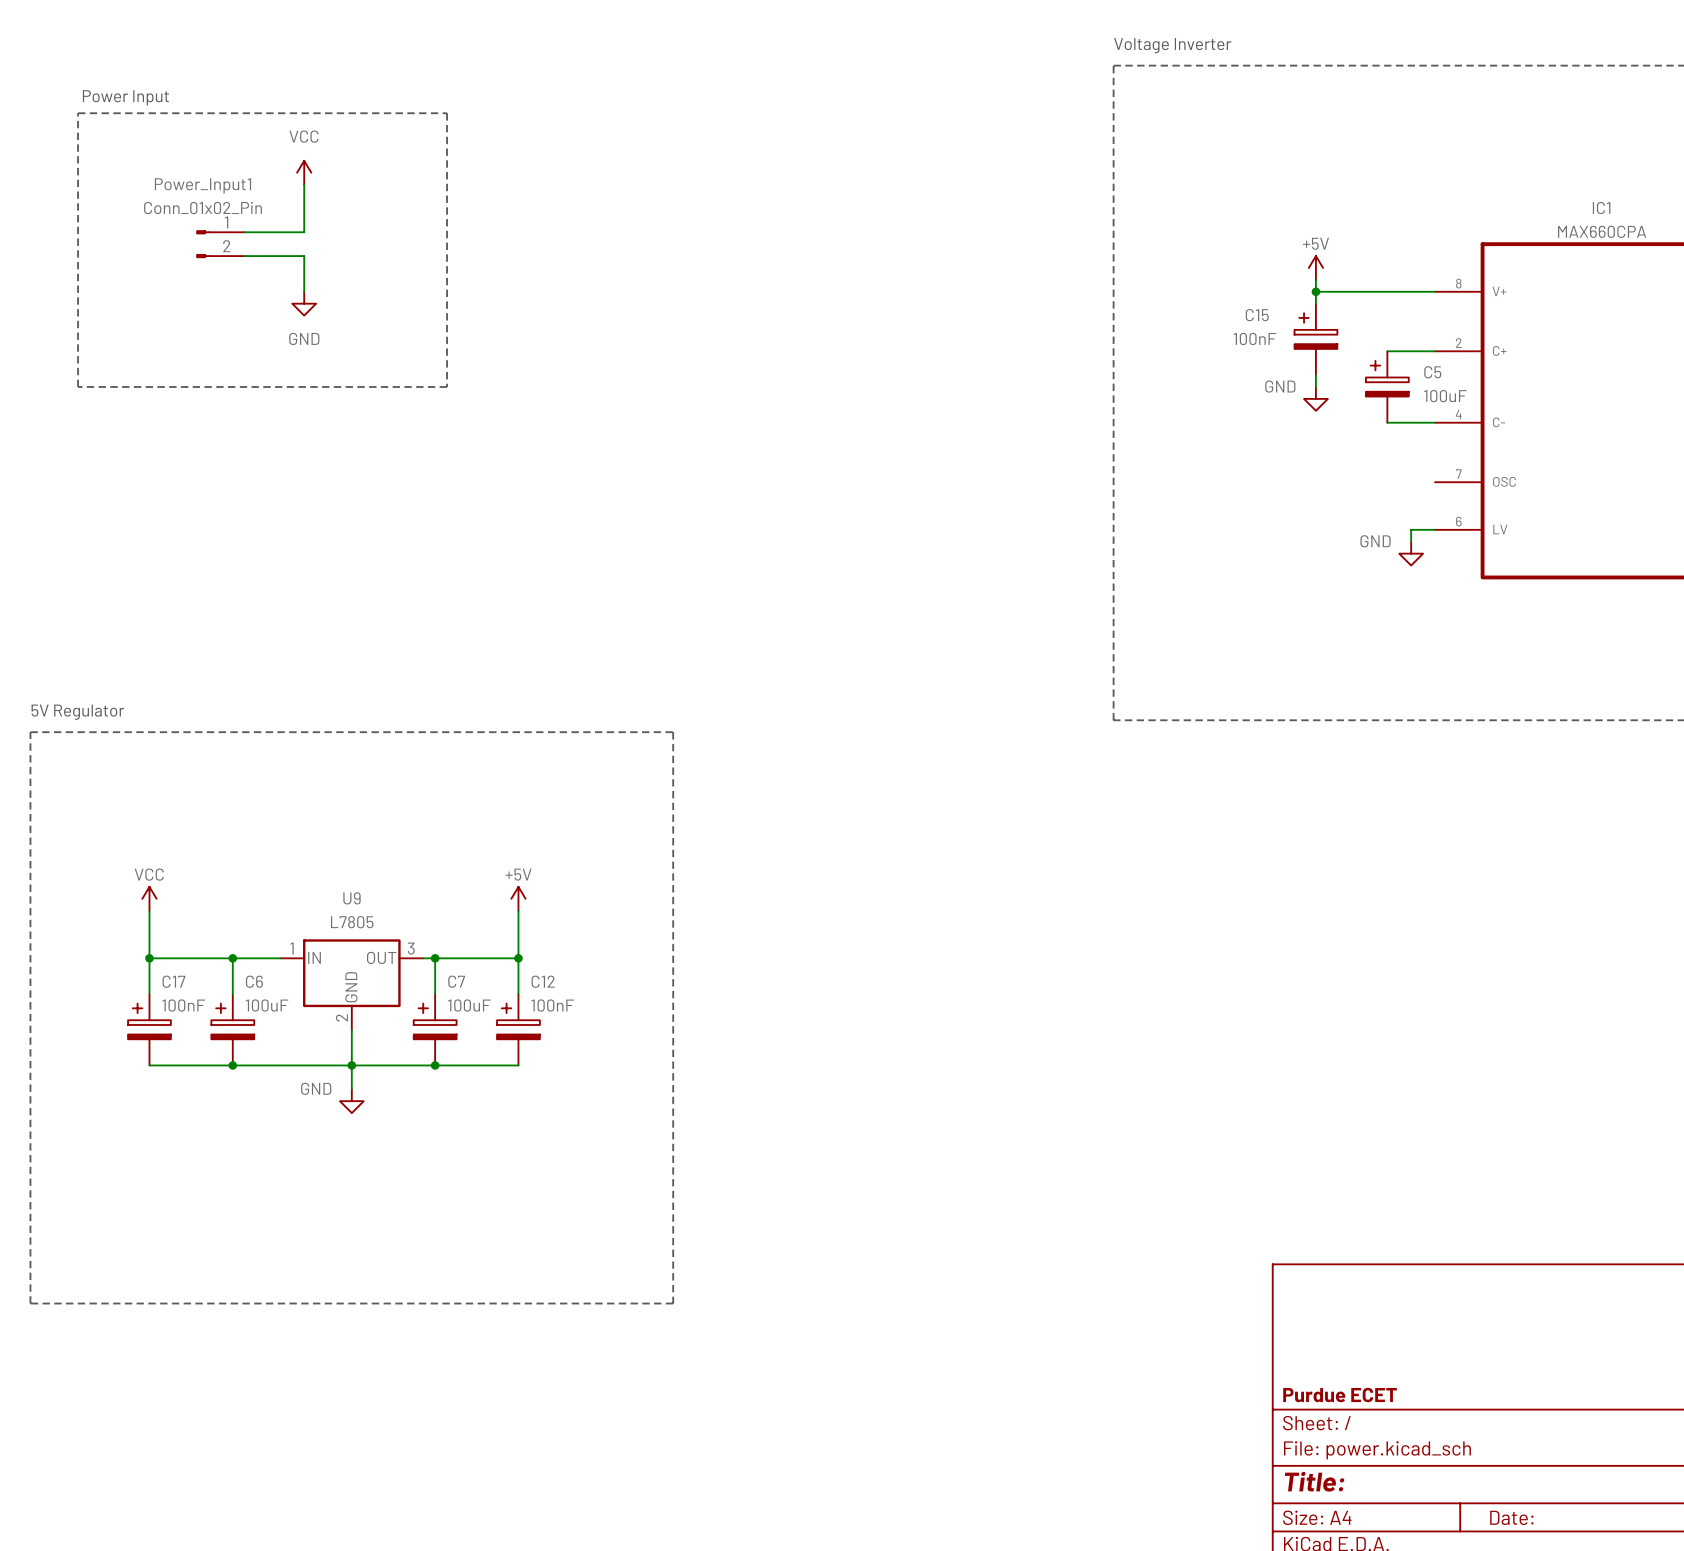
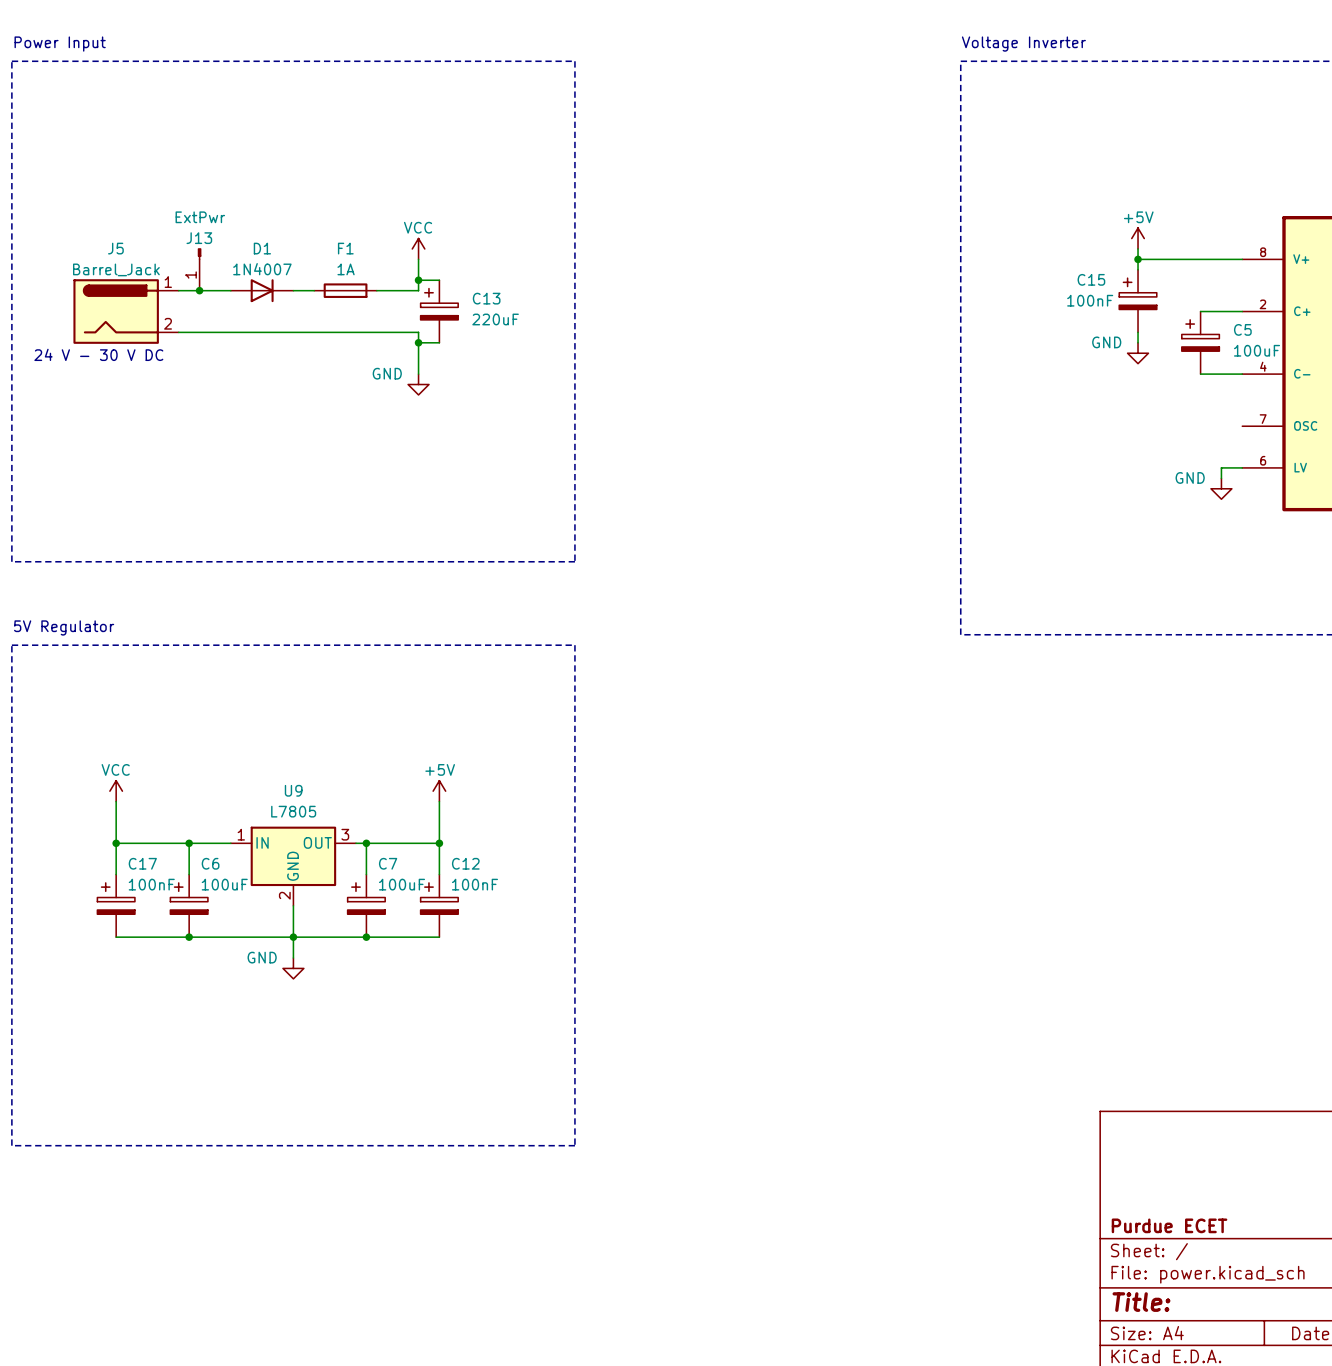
line: none -> (11, 61) (574, 61) (574, 561) (11, 561) (11, 61)
text position: Power Input (125, 97) -> Power Input (60, 44)
line: (78, 113) (447, 113) (447, 387) (78, 387) (78, 113) -> none
power symbol text position: VCC (303, 136) -> VCC (418, 227)
power symbol position: VCC (304, 172) -> VCC (418, 248)
wire: (304, 184) (304, 232) (244, 232) -> none
Power_Input1: Conn_01x02_Pin (220, 244) -> none
wire: (244, 256) (304, 256) (304, 291) -> none
wire: none -> (418, 259) (418, 290) (376, 290)
J13: none -> ExtPwr (199, 269)
power symbol position: GND (304, 303) -> GND (418, 384)
wire: none -> (418, 280) (439, 280)
junction: none -> (418, 280)
wire: none -> (178, 290) (230, 290)
junction: none -> (199, 290)
D1: none -> 1N4007 (262, 290)
wire: none -> (293, 290) (314, 290)
F1: none -> 1A (345, 290)
power symbol text position: GND (304, 338) -> GND (387, 373)
J5: none -> Barrel_Jack (126, 311)
C13: none -> 220uF (439, 311)
wire: none -> (178, 332) (418, 332) (418, 374)
wire: none -> (418, 342) (439, 342)
junction: none -> (418, 342)
text: none -> 24 V - 30 V DC (98, 354)

